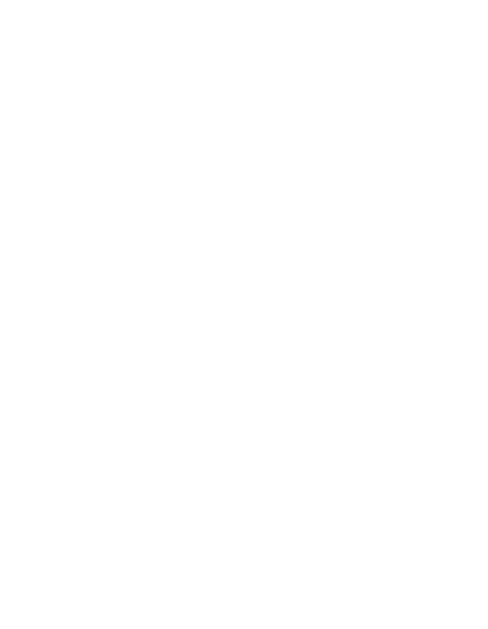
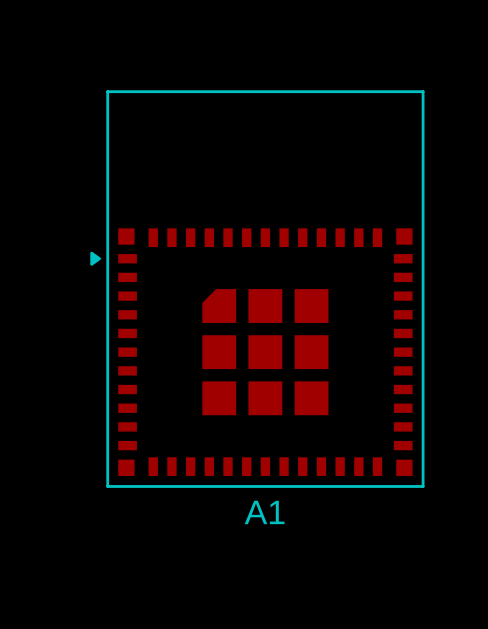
A1: none -> (257, 289)

